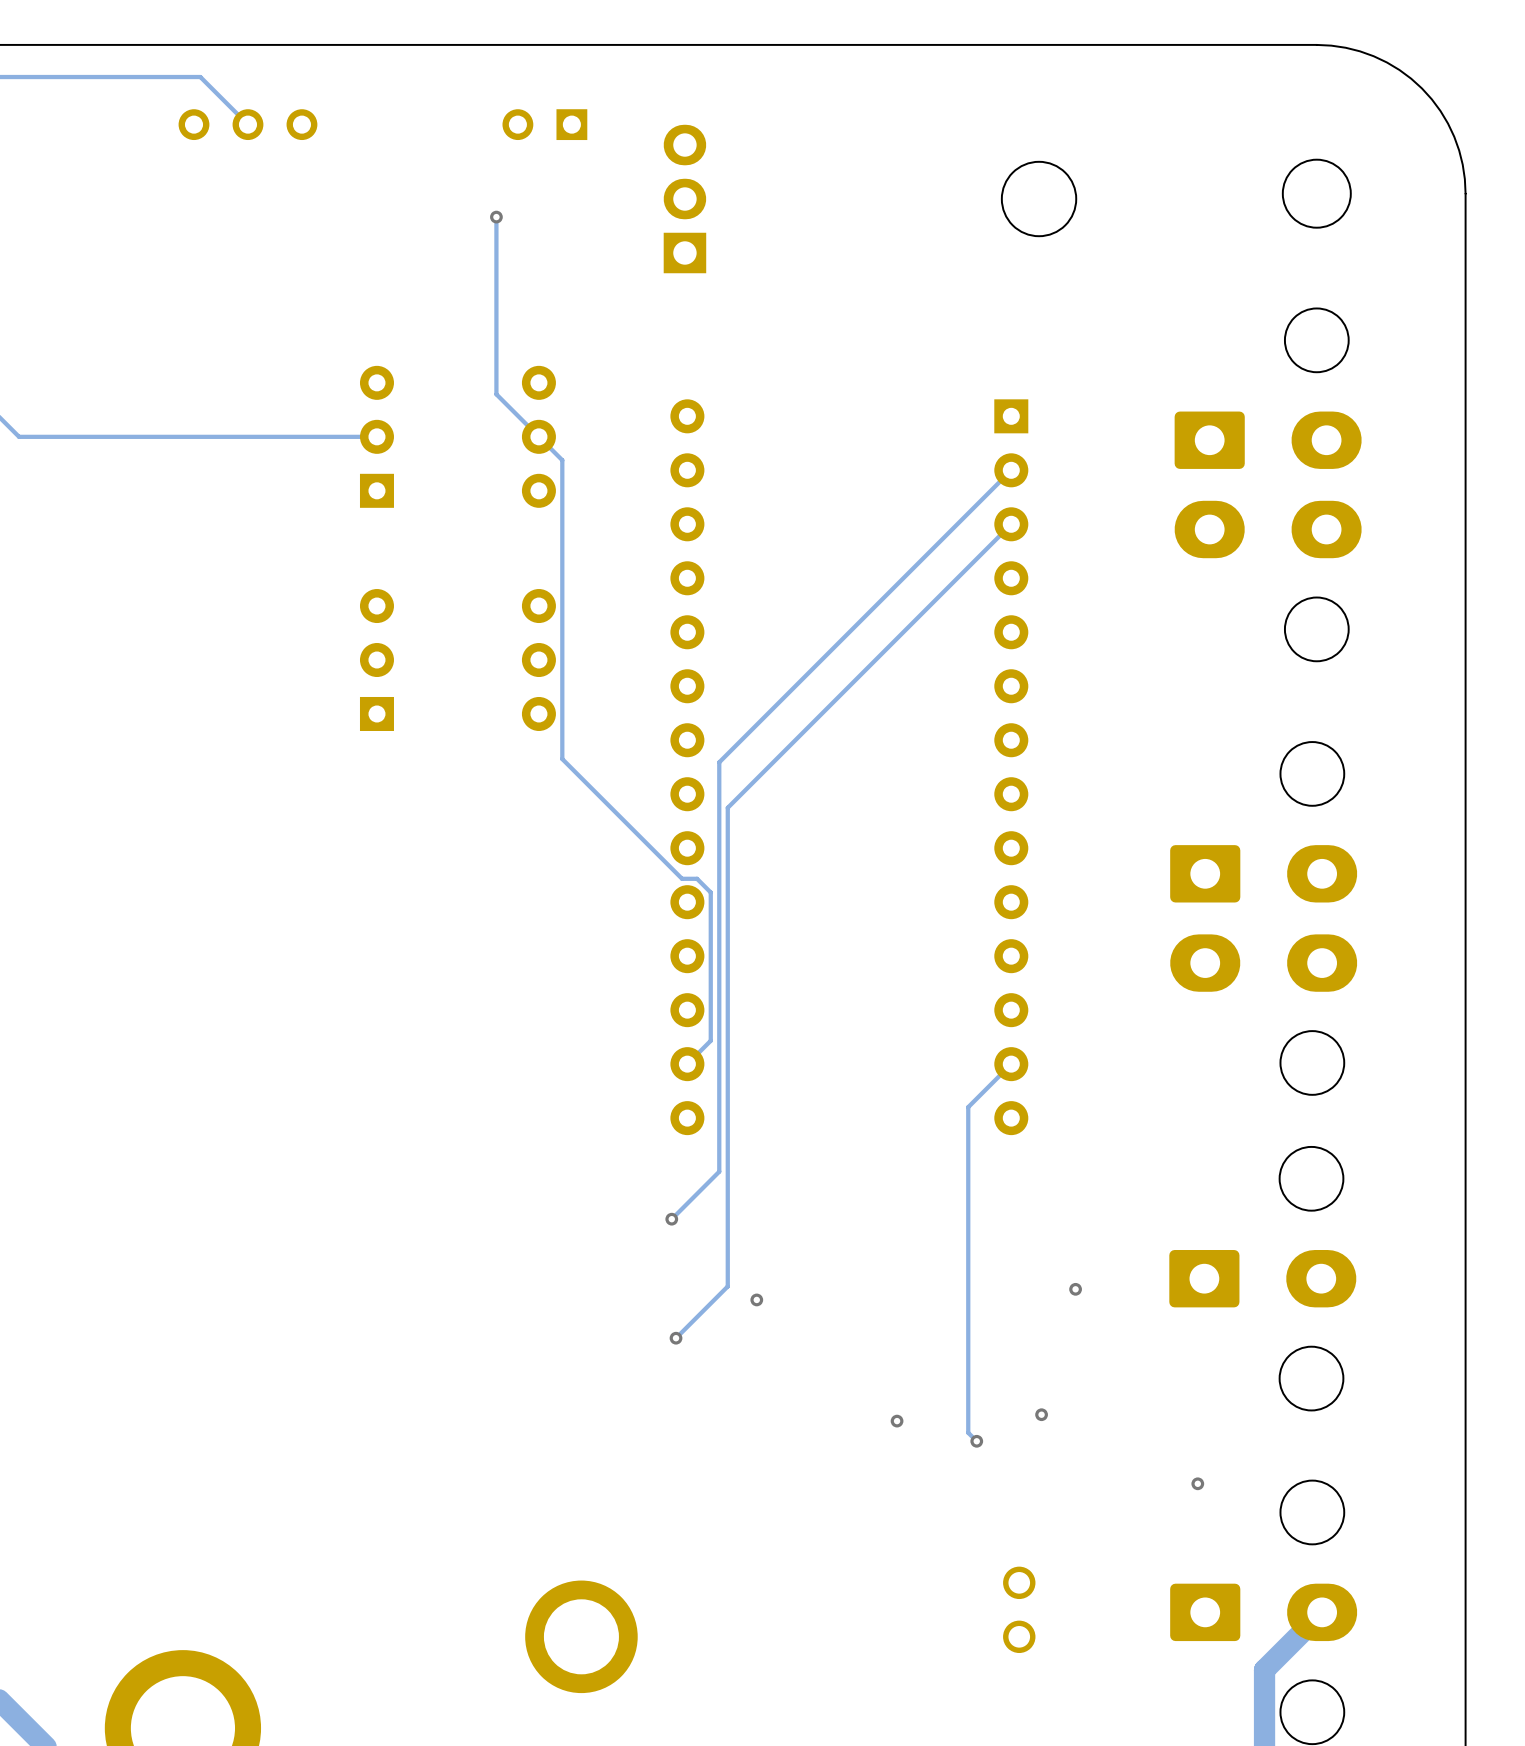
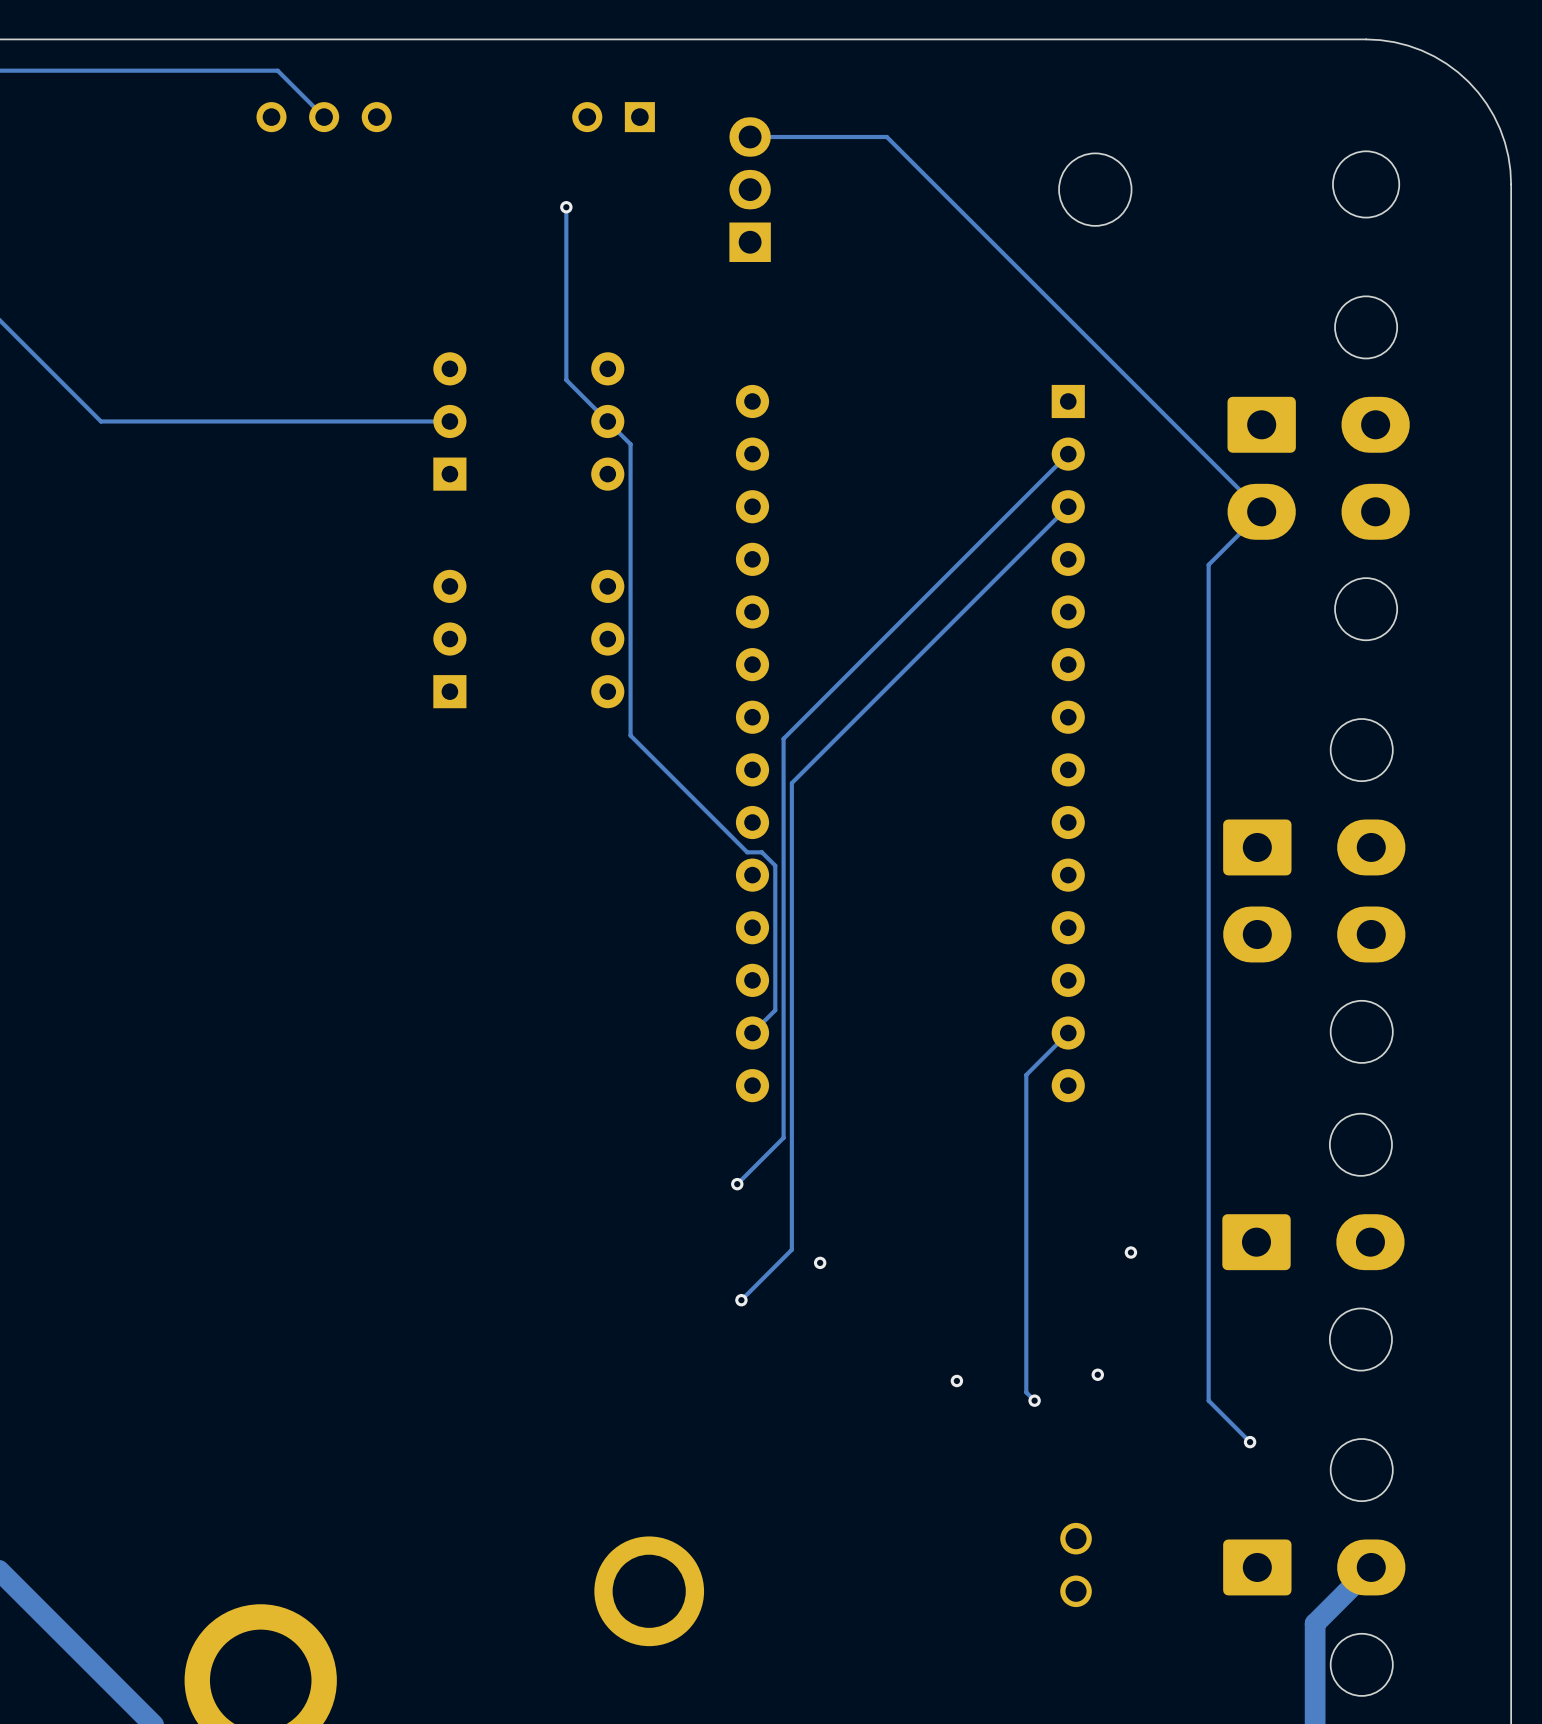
track: none -> (750, 137) (886, 137) (1261, 511) (1208, 564) (1208, 1400) (1250, 1442)

